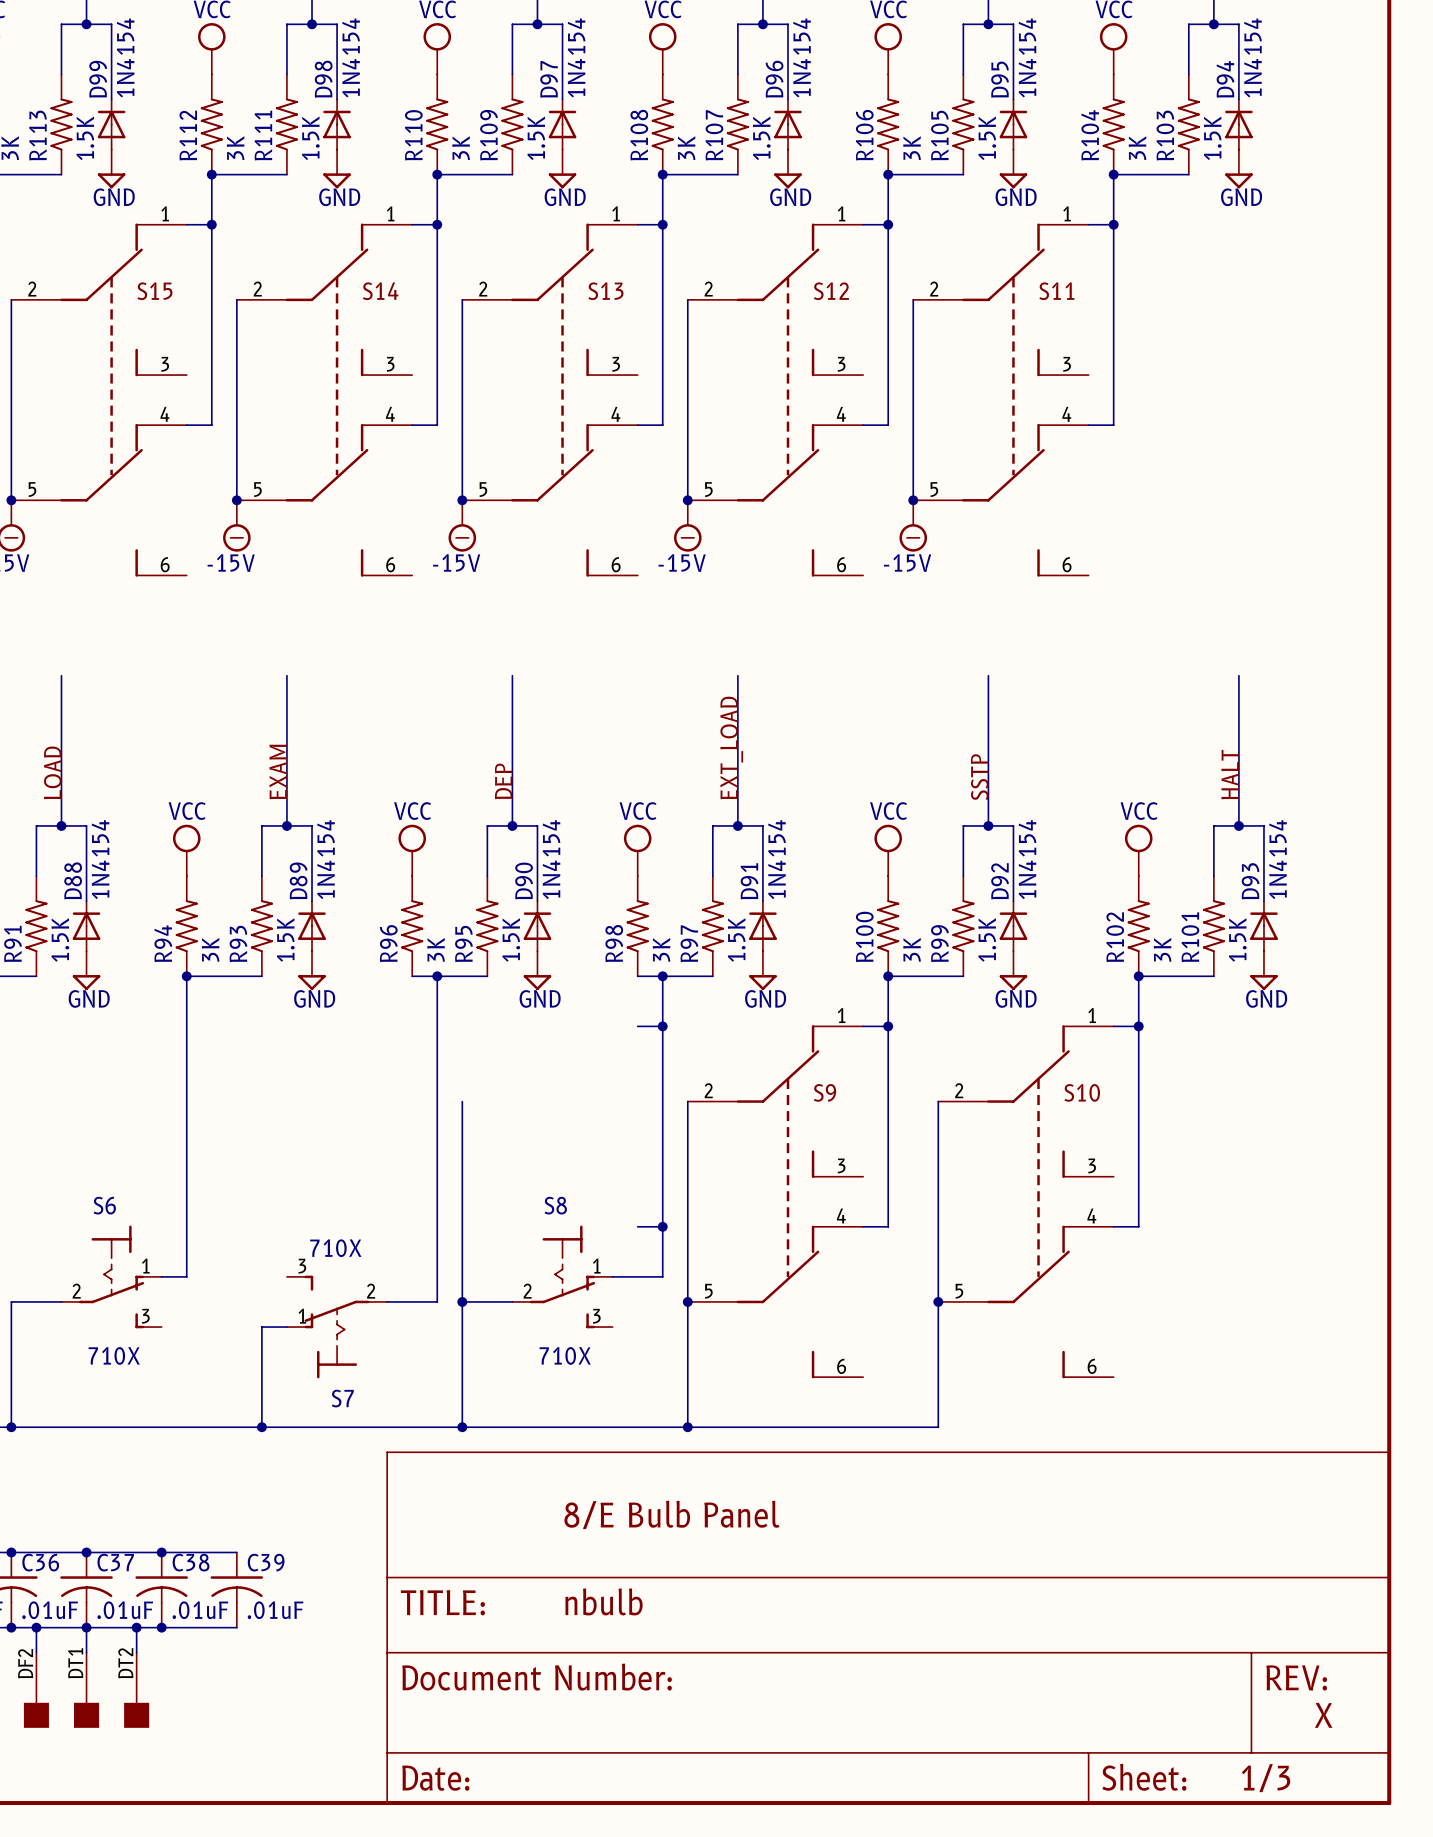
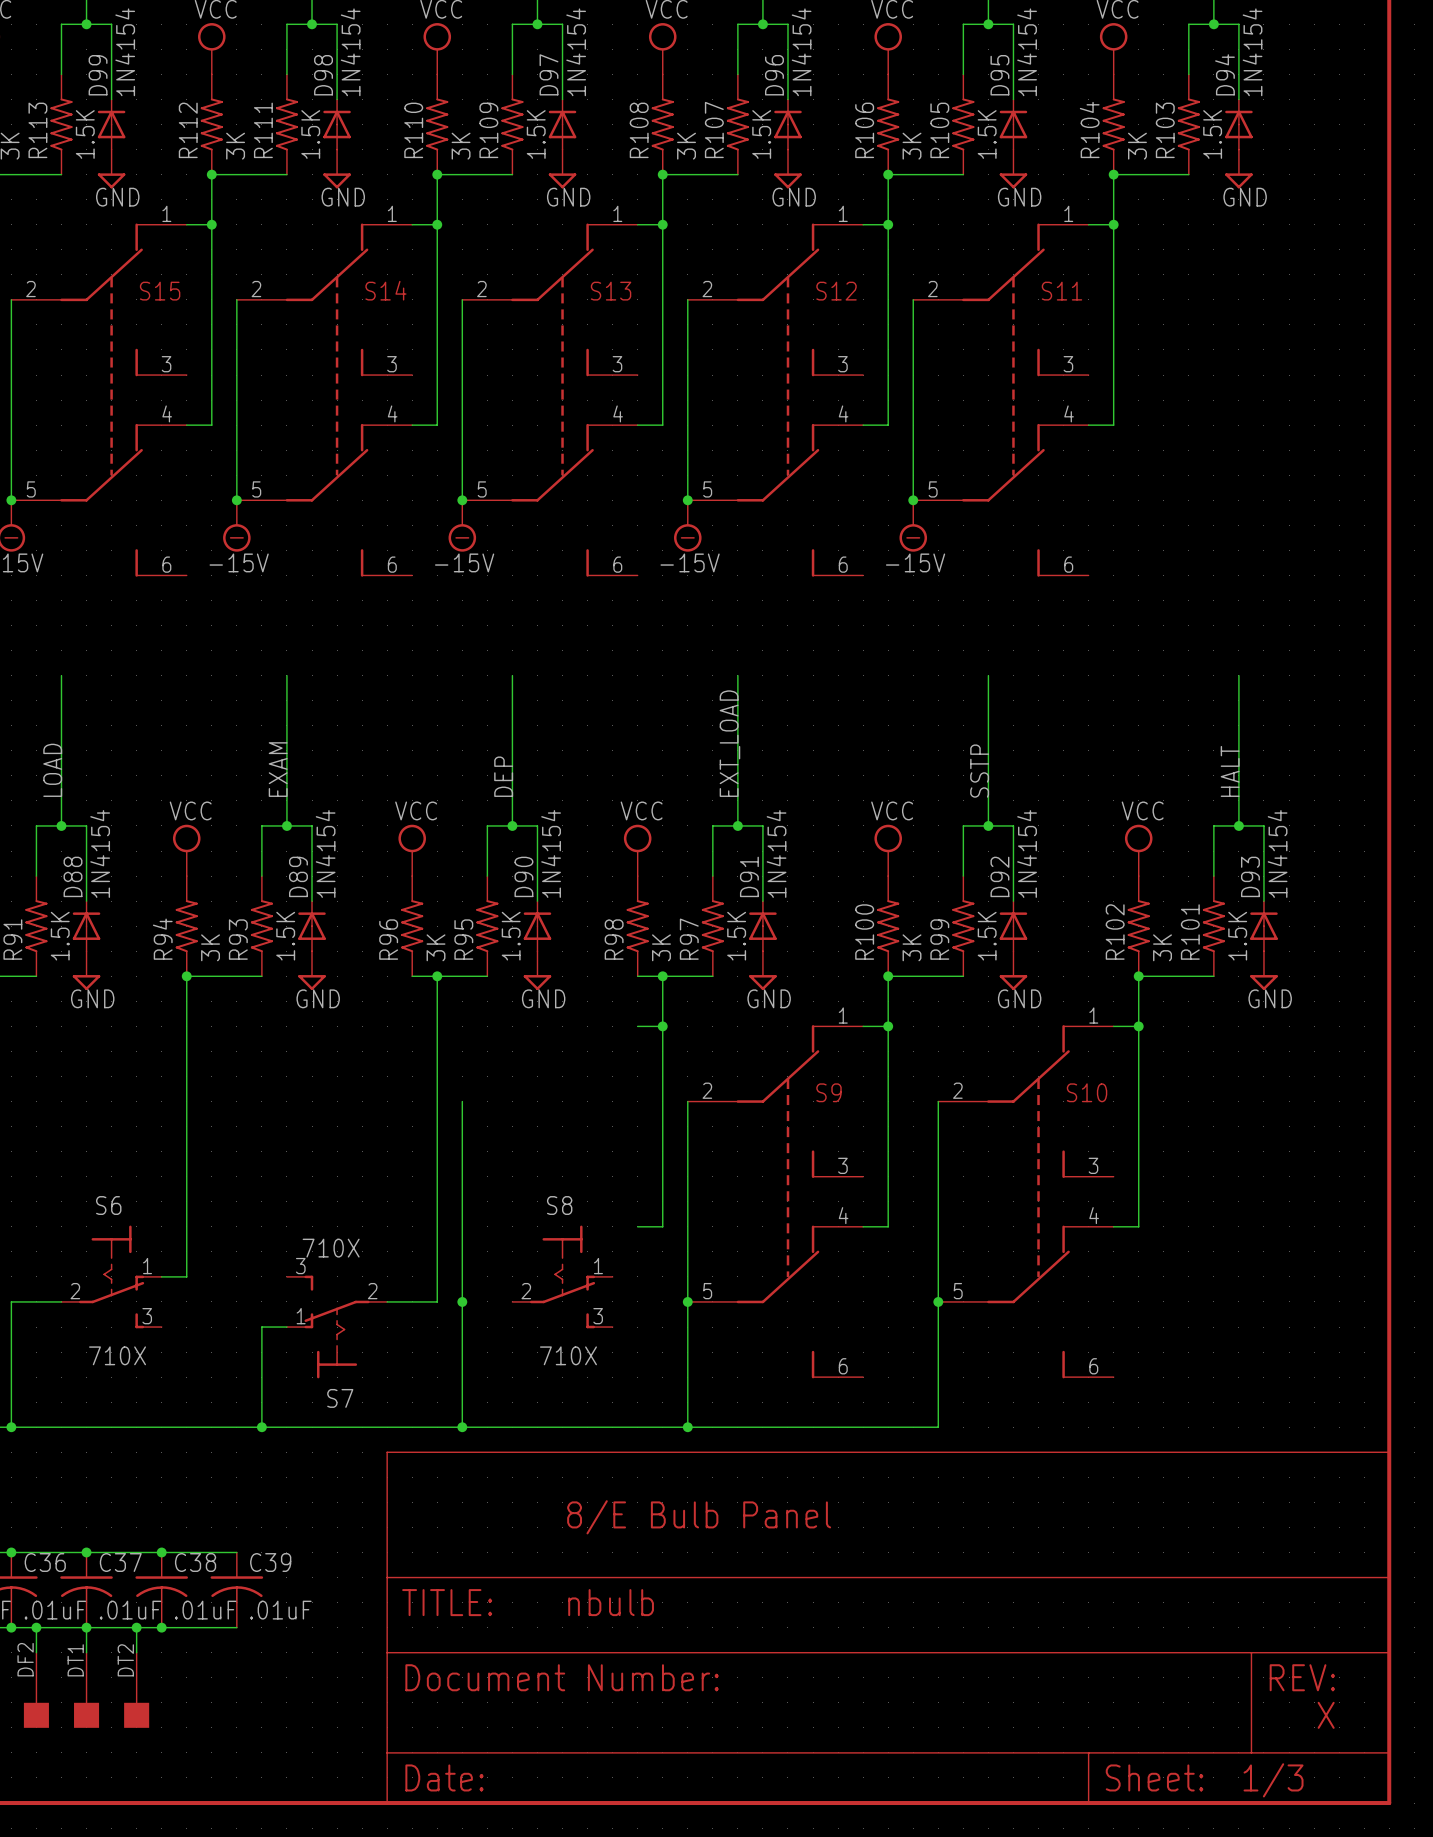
wire: (662, 1226) (662, 1276) (612, 1276) -> none
junction: (662, 1226) -> none
wire: (462, 1301) (512, 1301) -> none

